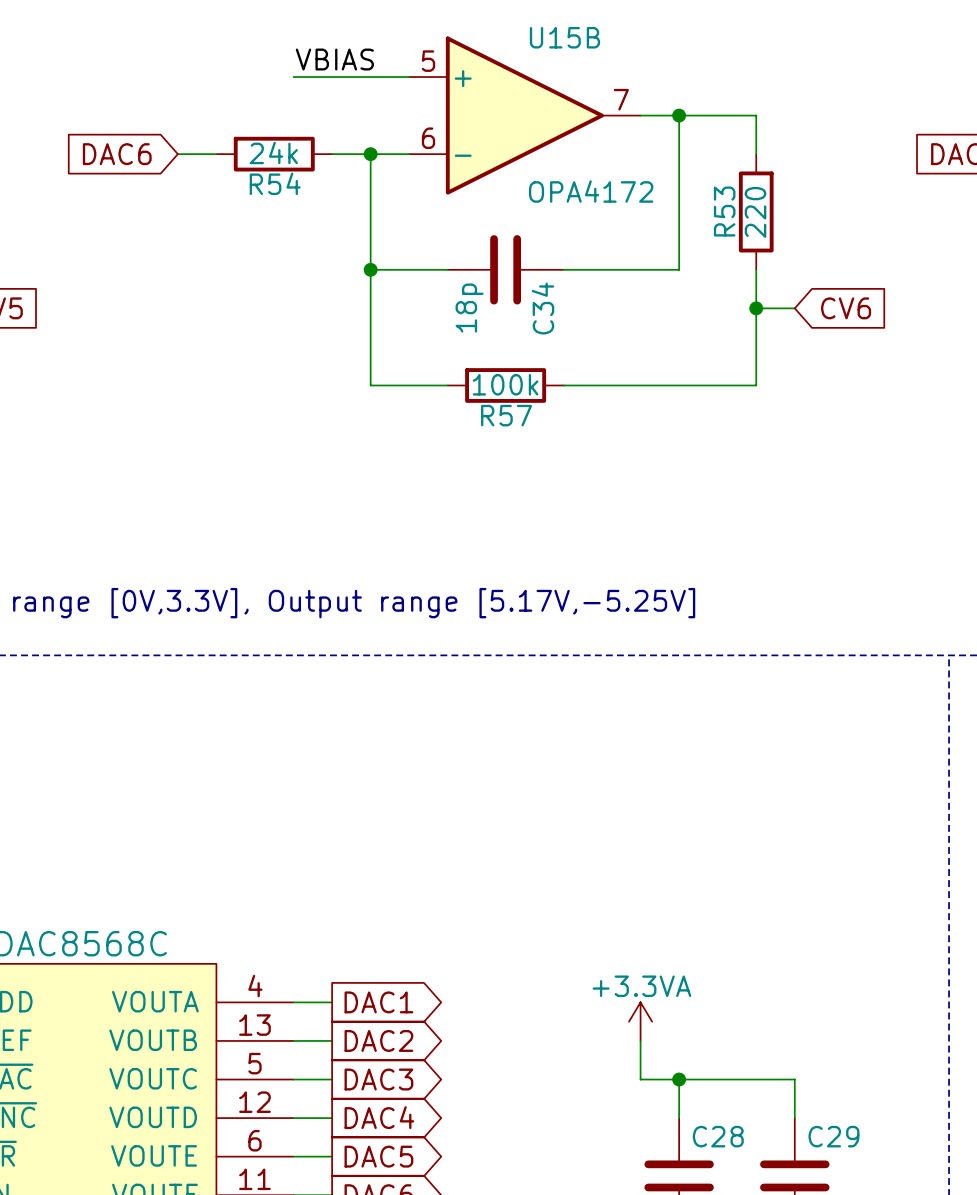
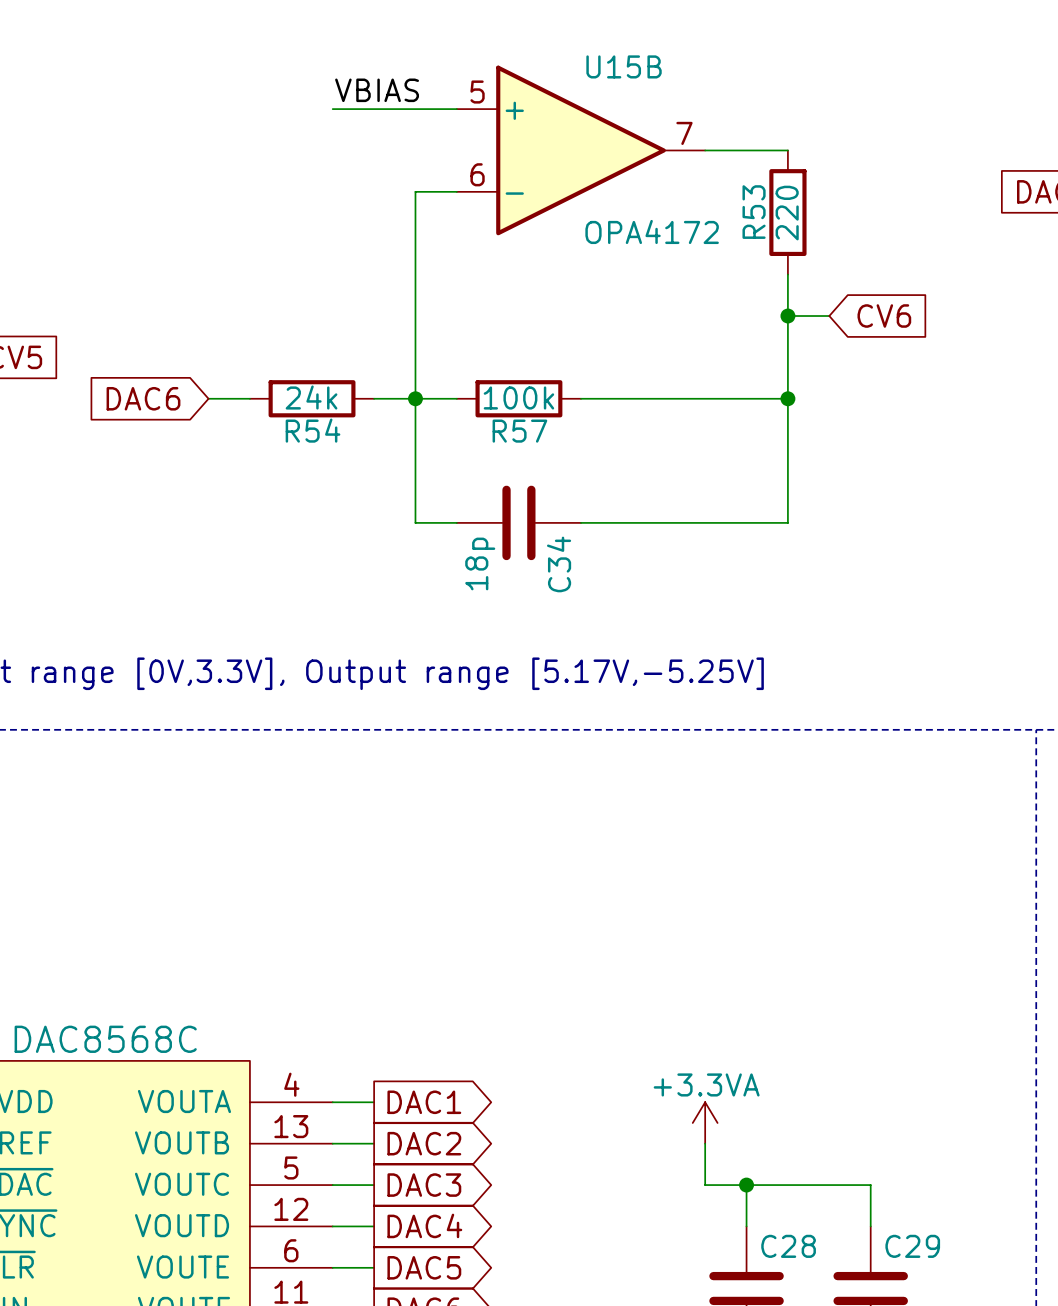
wire: (679, 115) (679, 269) (563, 269) -> none
junction: (679, 115) -> none
wire: (717, 115) (756, 115) (756, 154) -> none
global label position: DAC6 (117, 154) -> DAC6 (143, 398)
wire: (177, 154) (216, 154) -> (208, 398) (249, 398)
R54 position: (274, 154) -> (312, 398)
wire: (332, 154) (370, 154) -> none
junction: (370, 154) -> none
R53 position: (756, 211) -> (787, 212)
wire: none -> (787, 274) (787, 522) (581, 522)
wire: (370, 269) (447, 269) -> (374, 398) (456, 398)
junction position: (370, 269) -> (415, 398)
C34 position: (505, 269) -> (518, 522)
junction: none -> (787, 316)
wire: (756, 269) (756, 385) (563, 385) -> (829, 316) (787, 316)
wire: (756, 308) (794, 308) -> none
junction: (756, 308) -> none
global label position: CV6 (846, 308) -> CV6 (884, 316)
wire: none -> (581, 398) (787, 398)
junction: none -> (787, 398)
wire: (370, 385) (447, 385) -> (415, 440) (415, 522) (456, 522)
R57 position: (505, 385) -> (518, 398)

